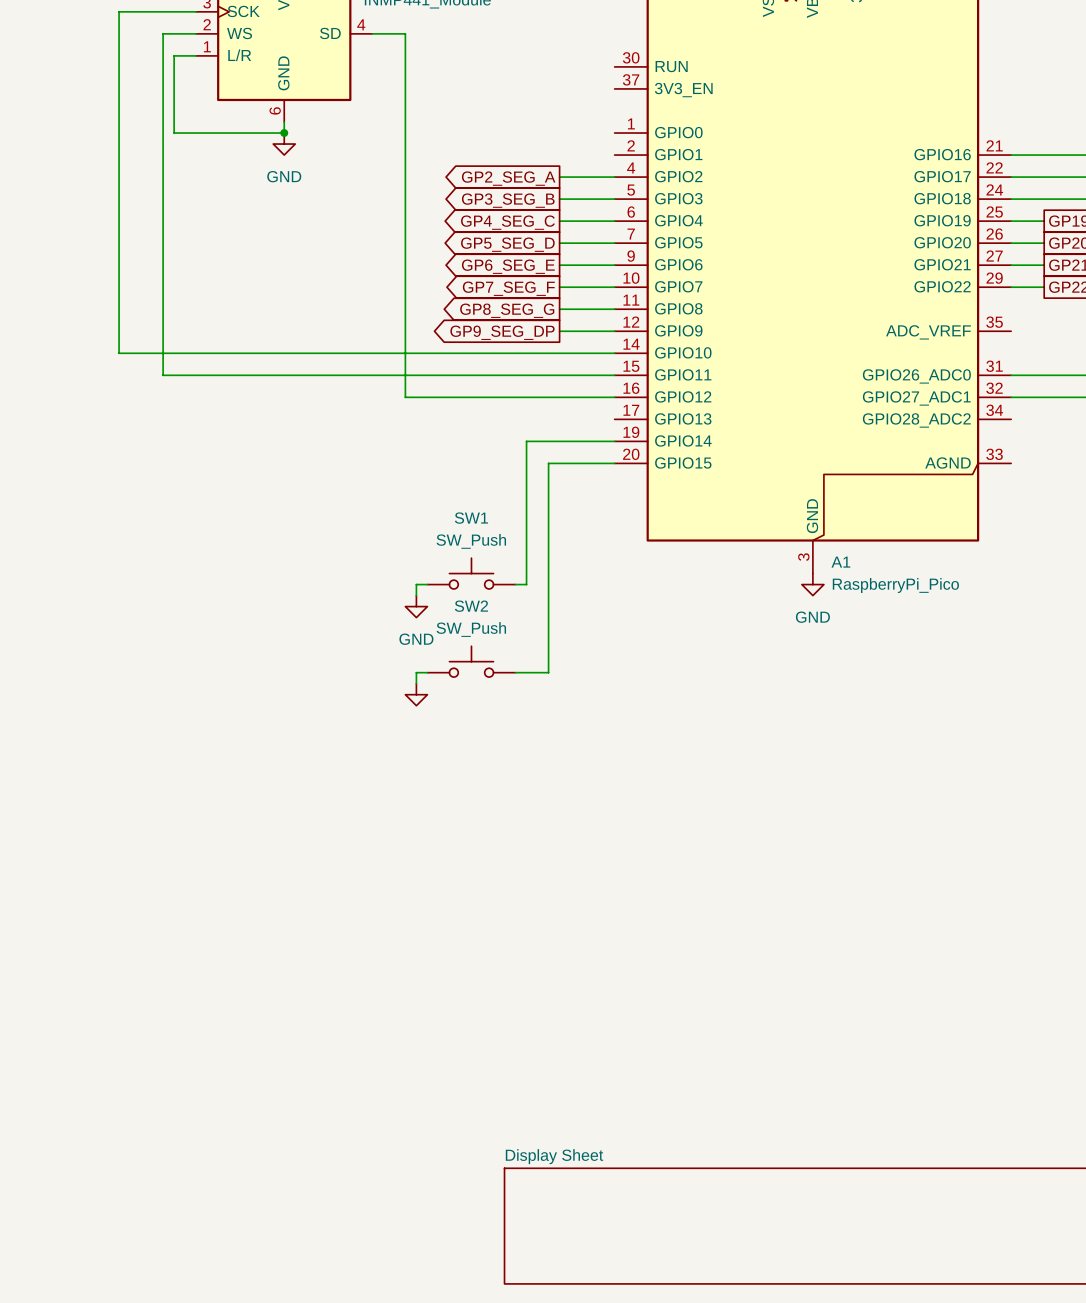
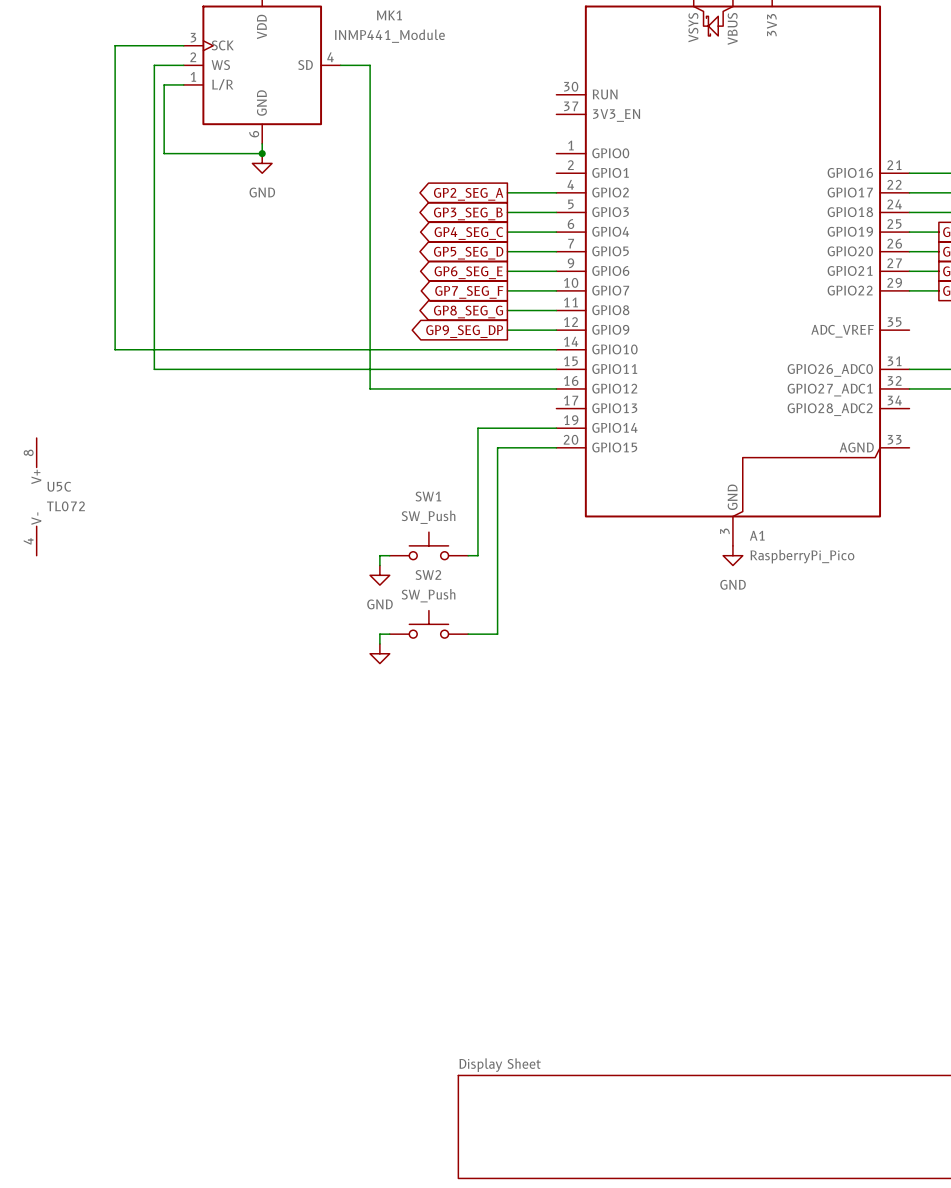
U5C: none -> TL072 (36, 496)

